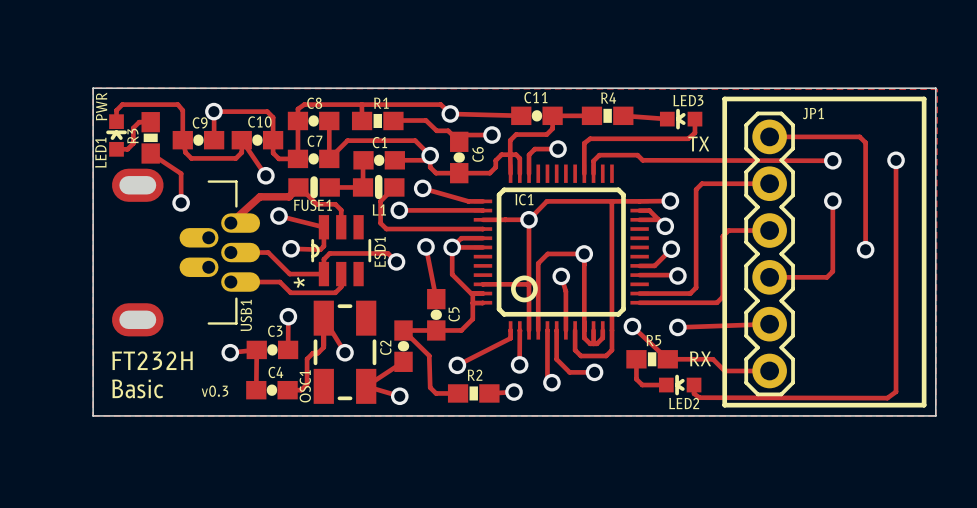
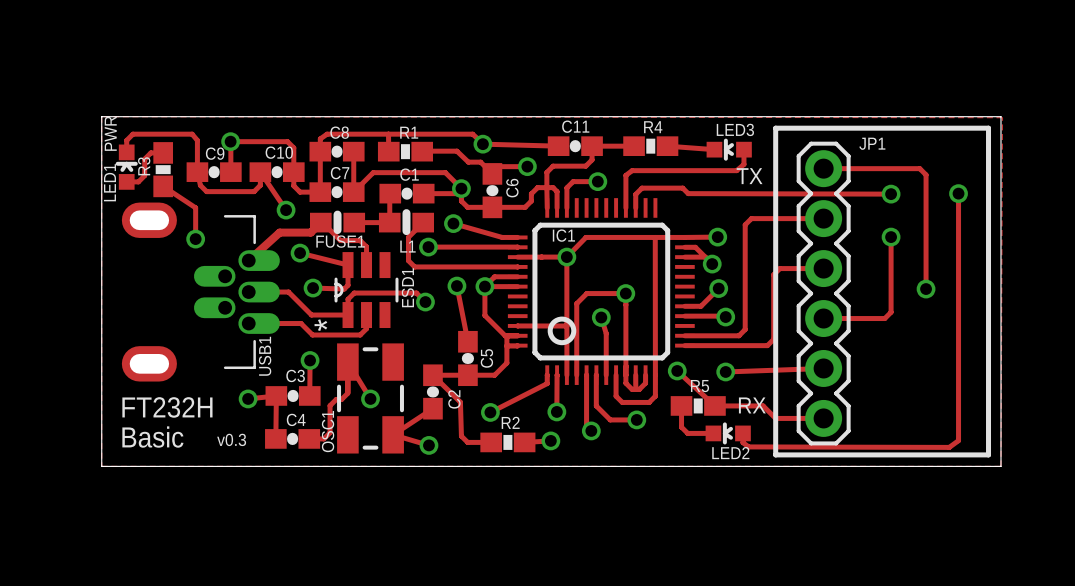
C2 name position: C2 (385, 347) -> C2 (454, 399)

